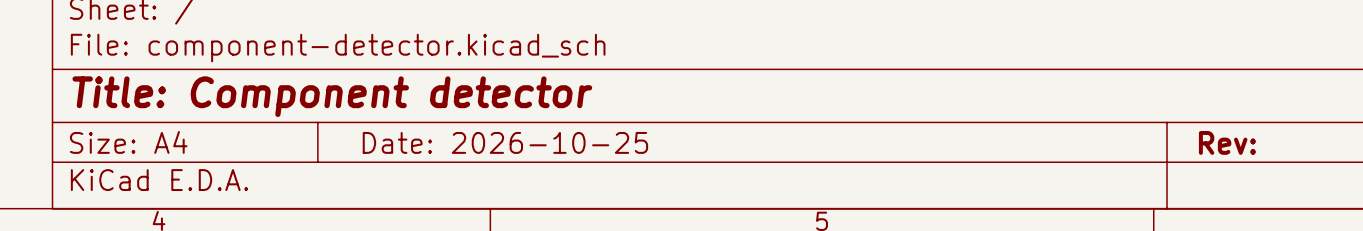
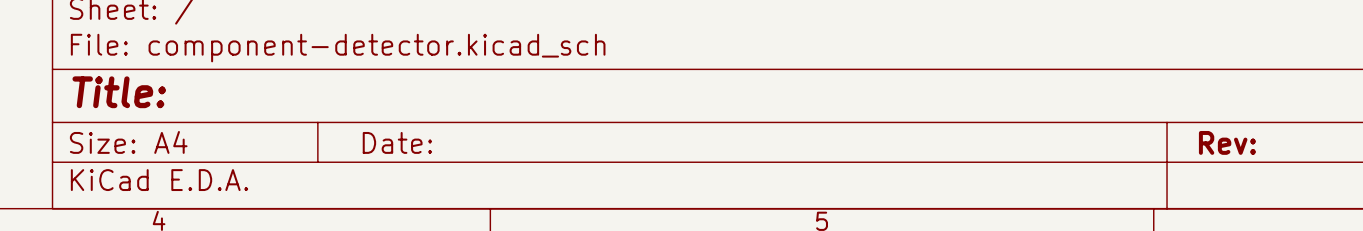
title block: Title: Component detector (332, 96) -> Title: (119, 92)
title block: Date: 2026-10-25 (505, 142) -> Date: (397, 142)

